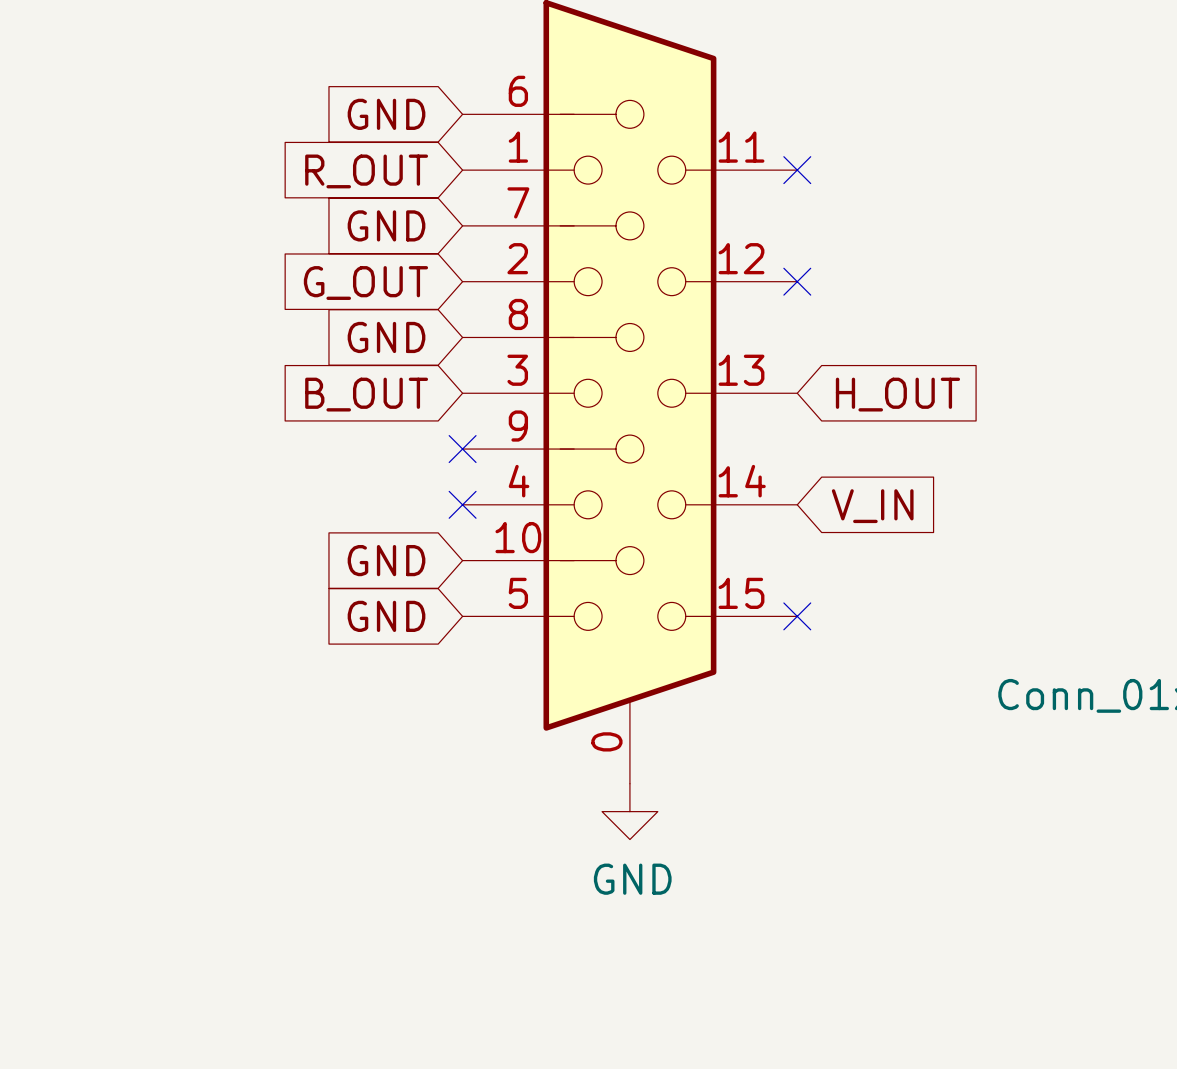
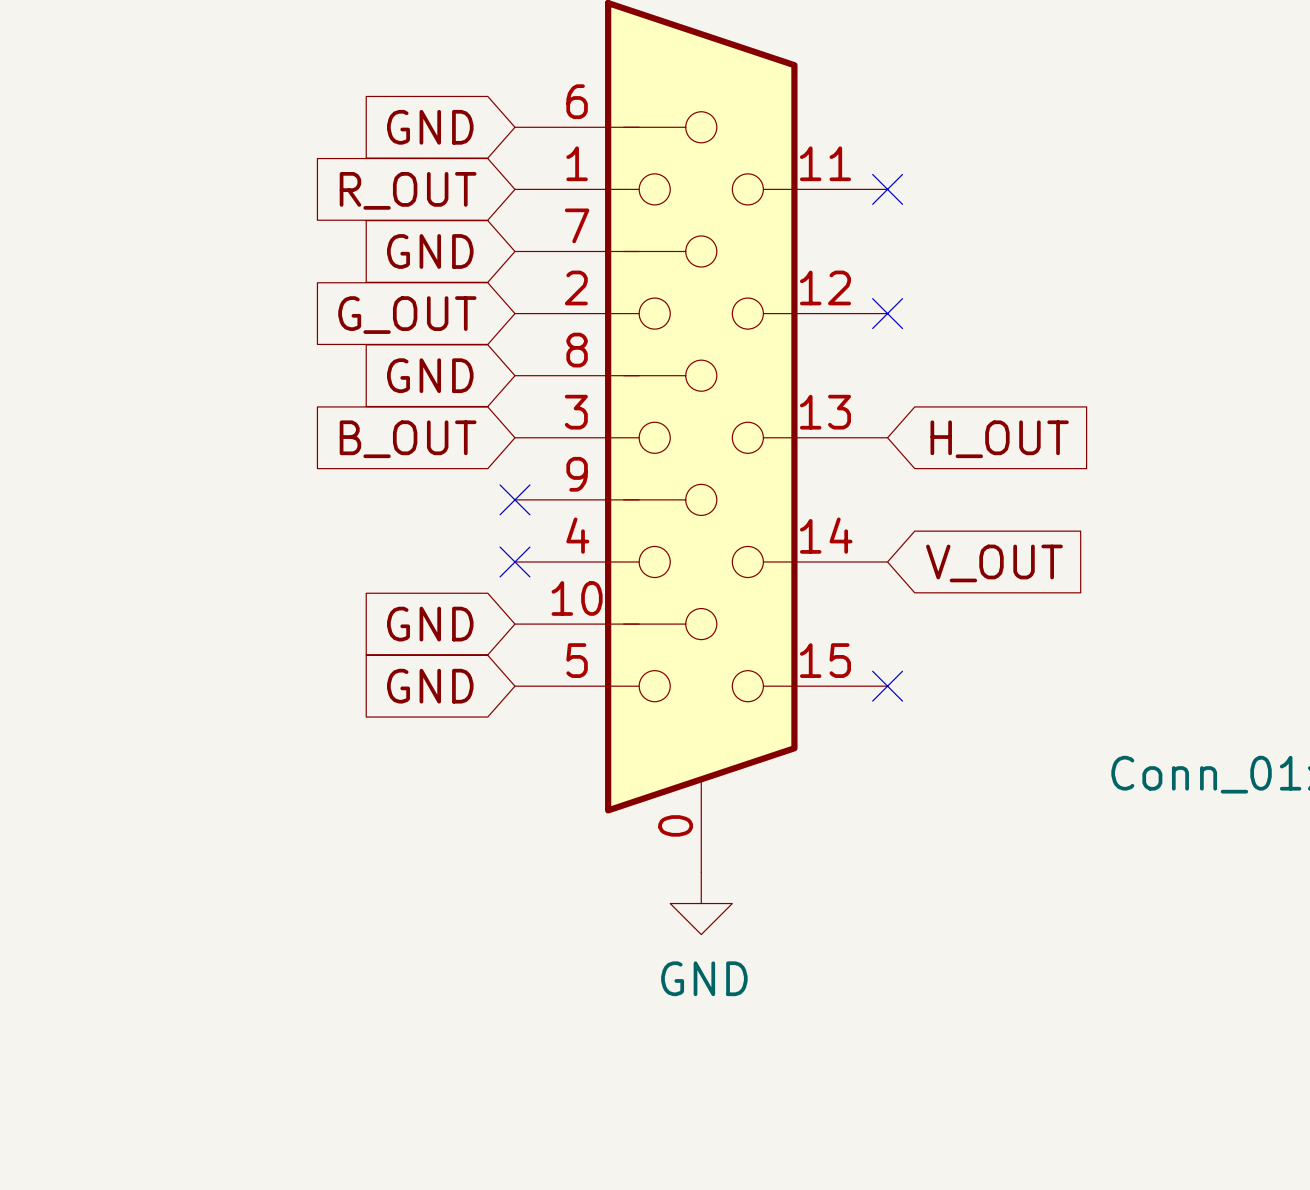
global label: V_IN (872, 506) -> V_OUT (994, 563)

